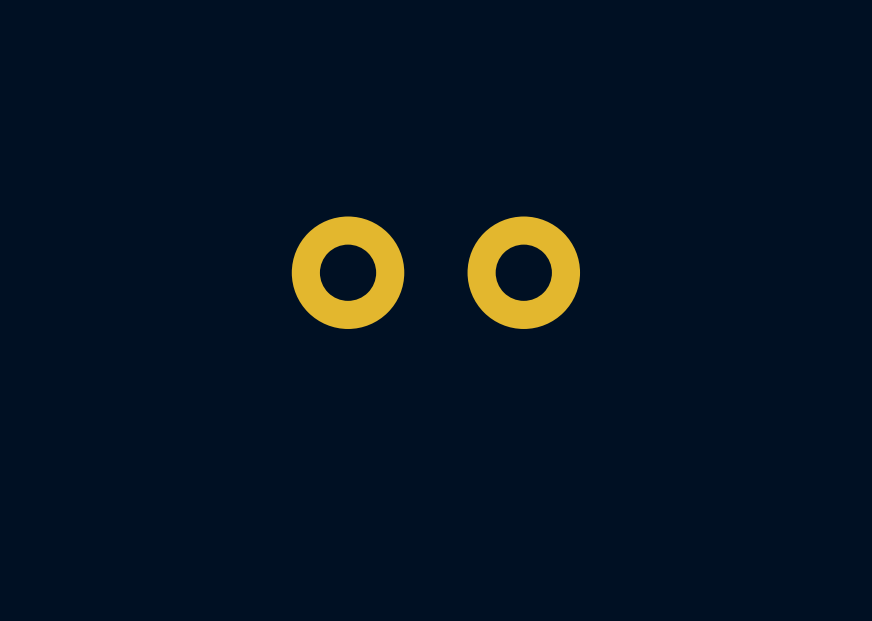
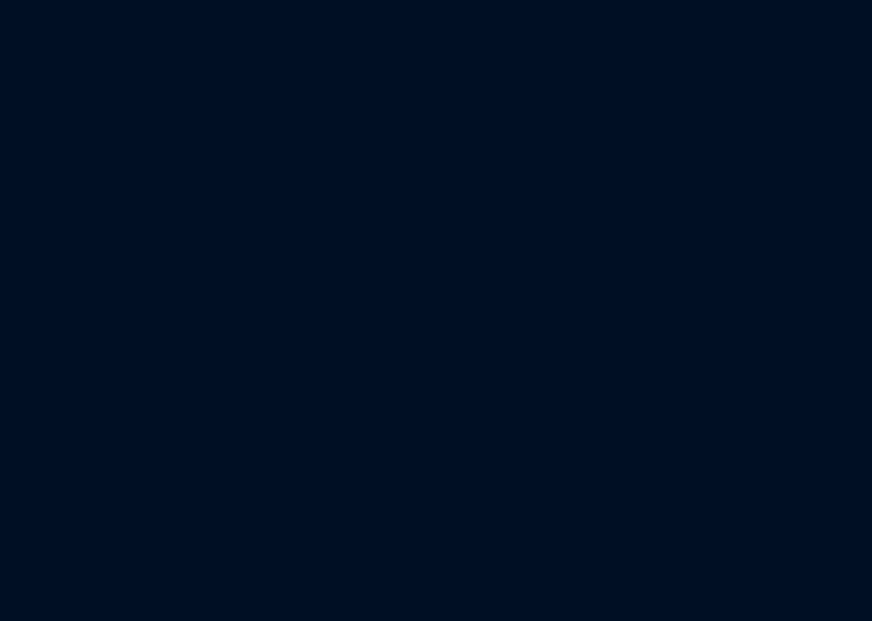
part: (435, 272) -> none

